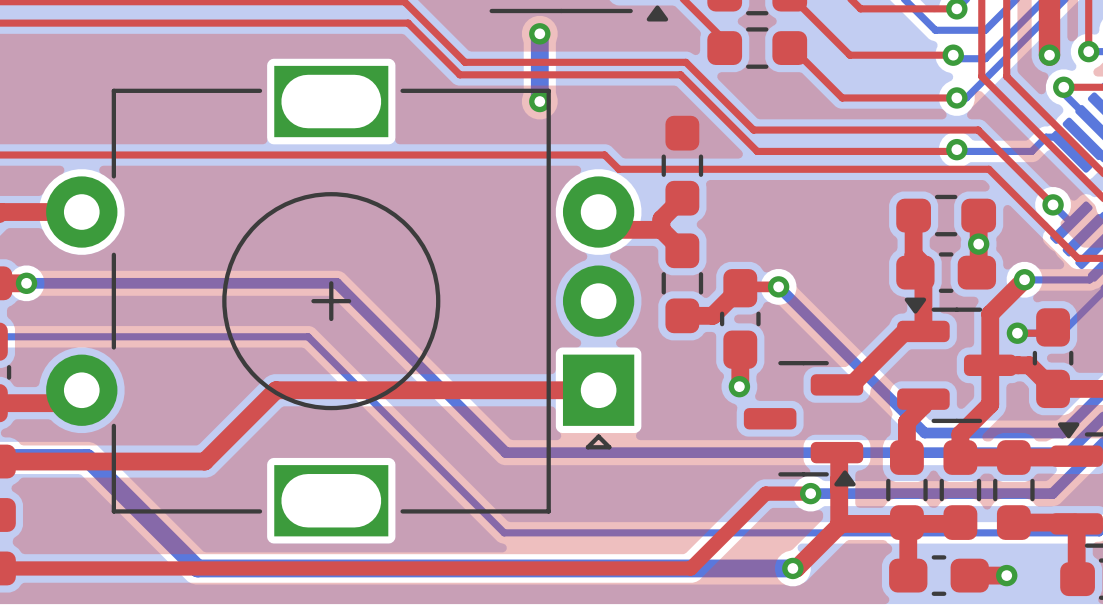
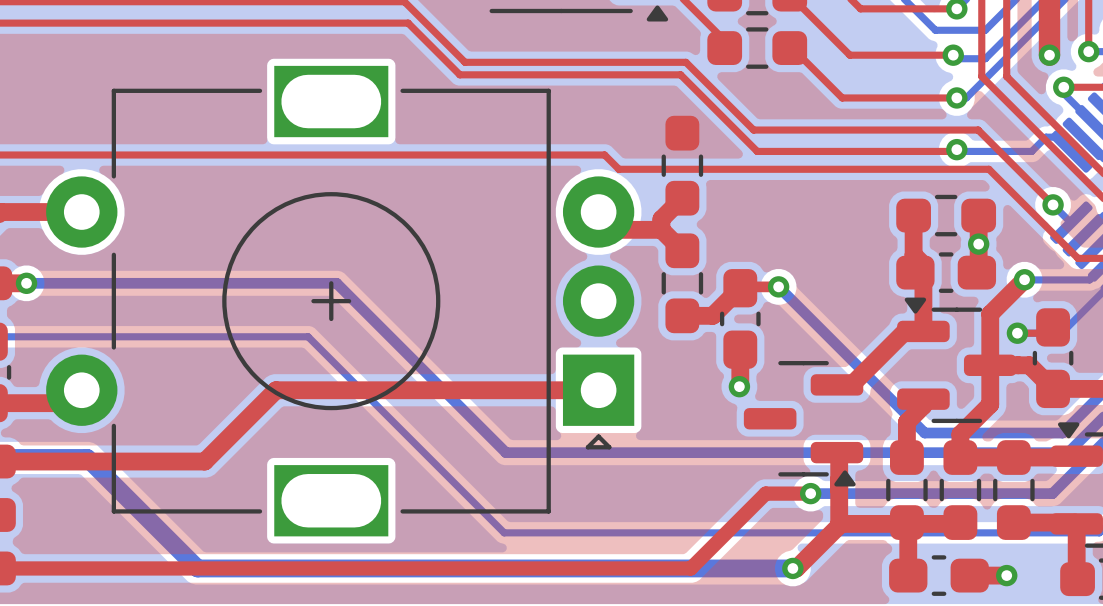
bottom track: (539, 33) (539, 101) -> none
via: (539, 33) -> none
via: (539, 101) -> none

